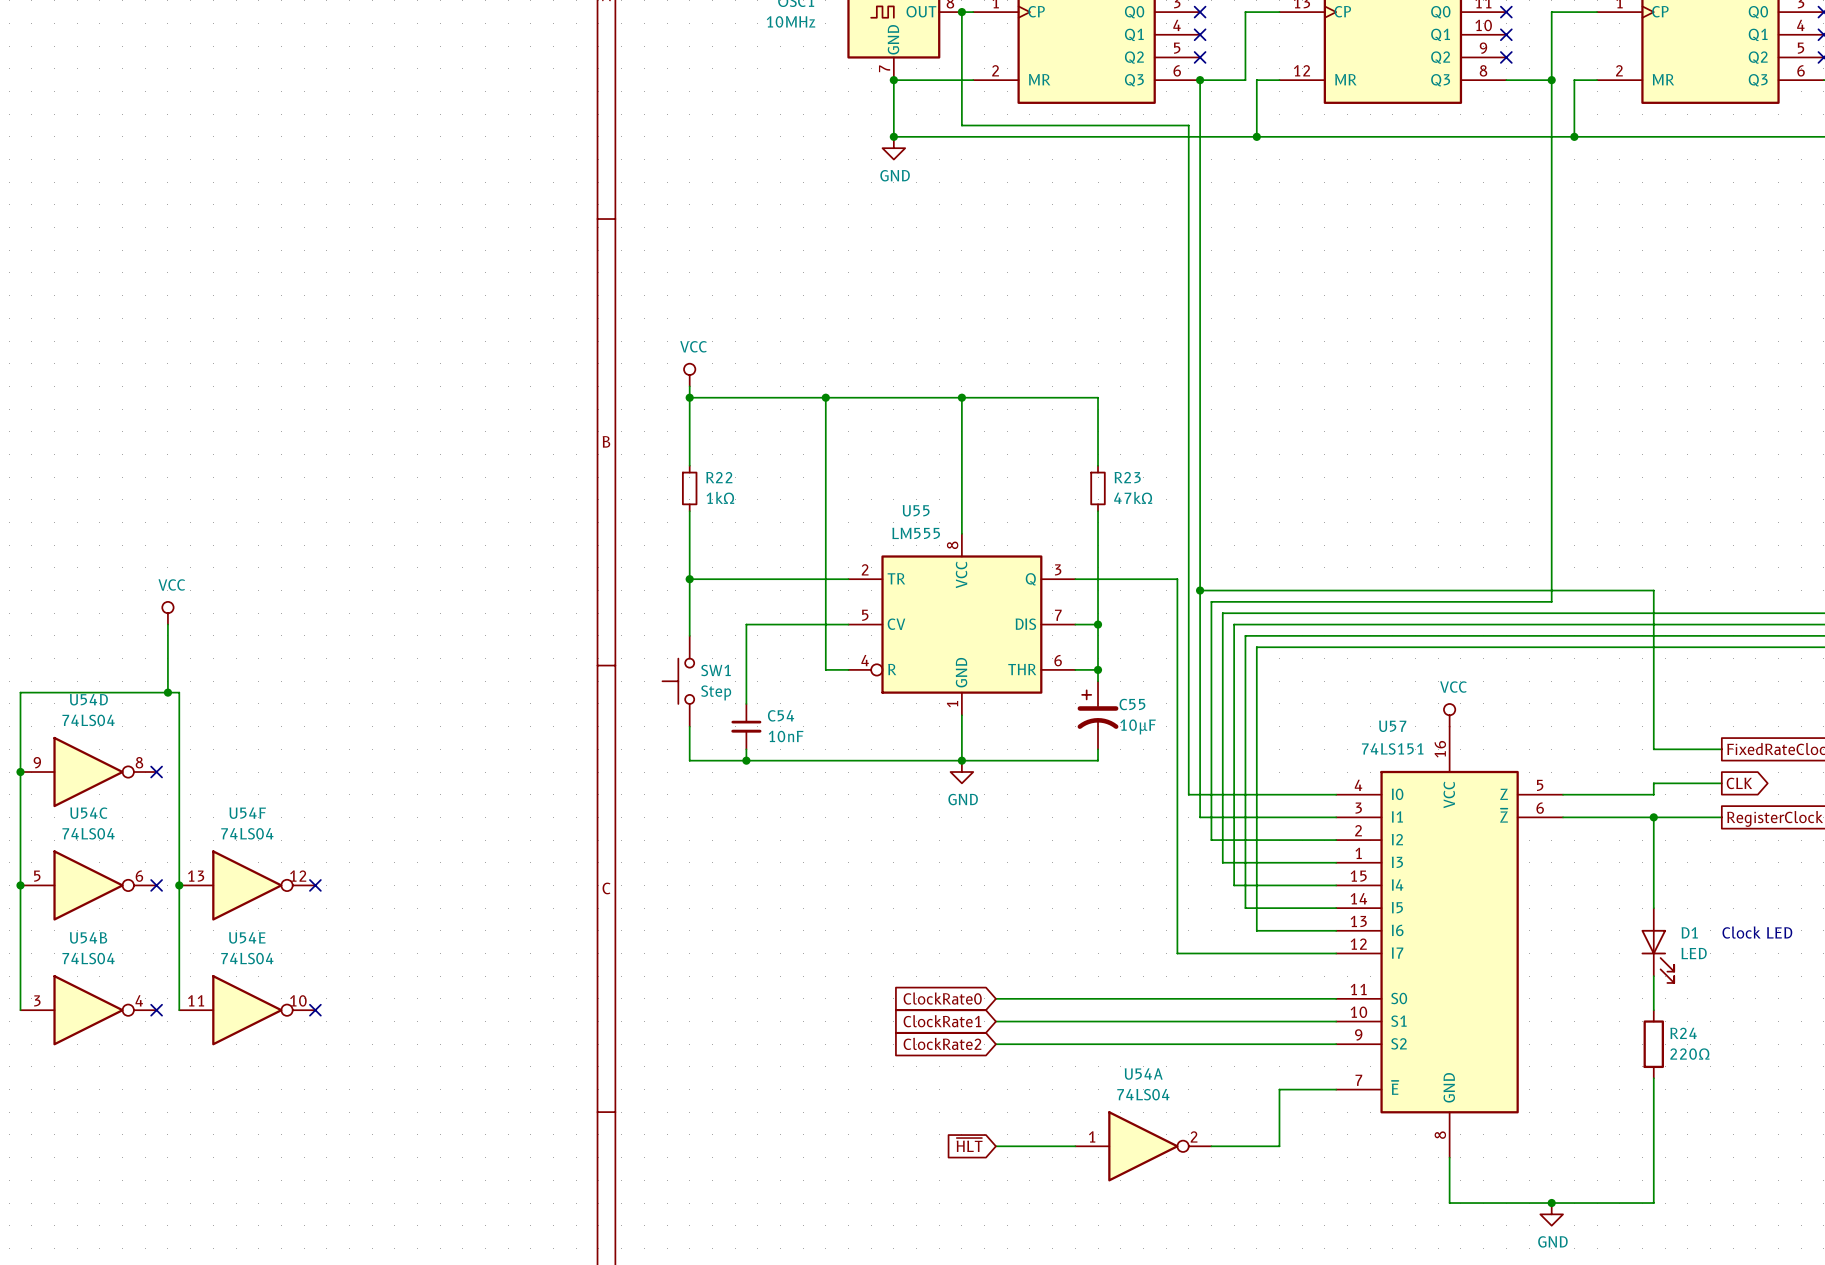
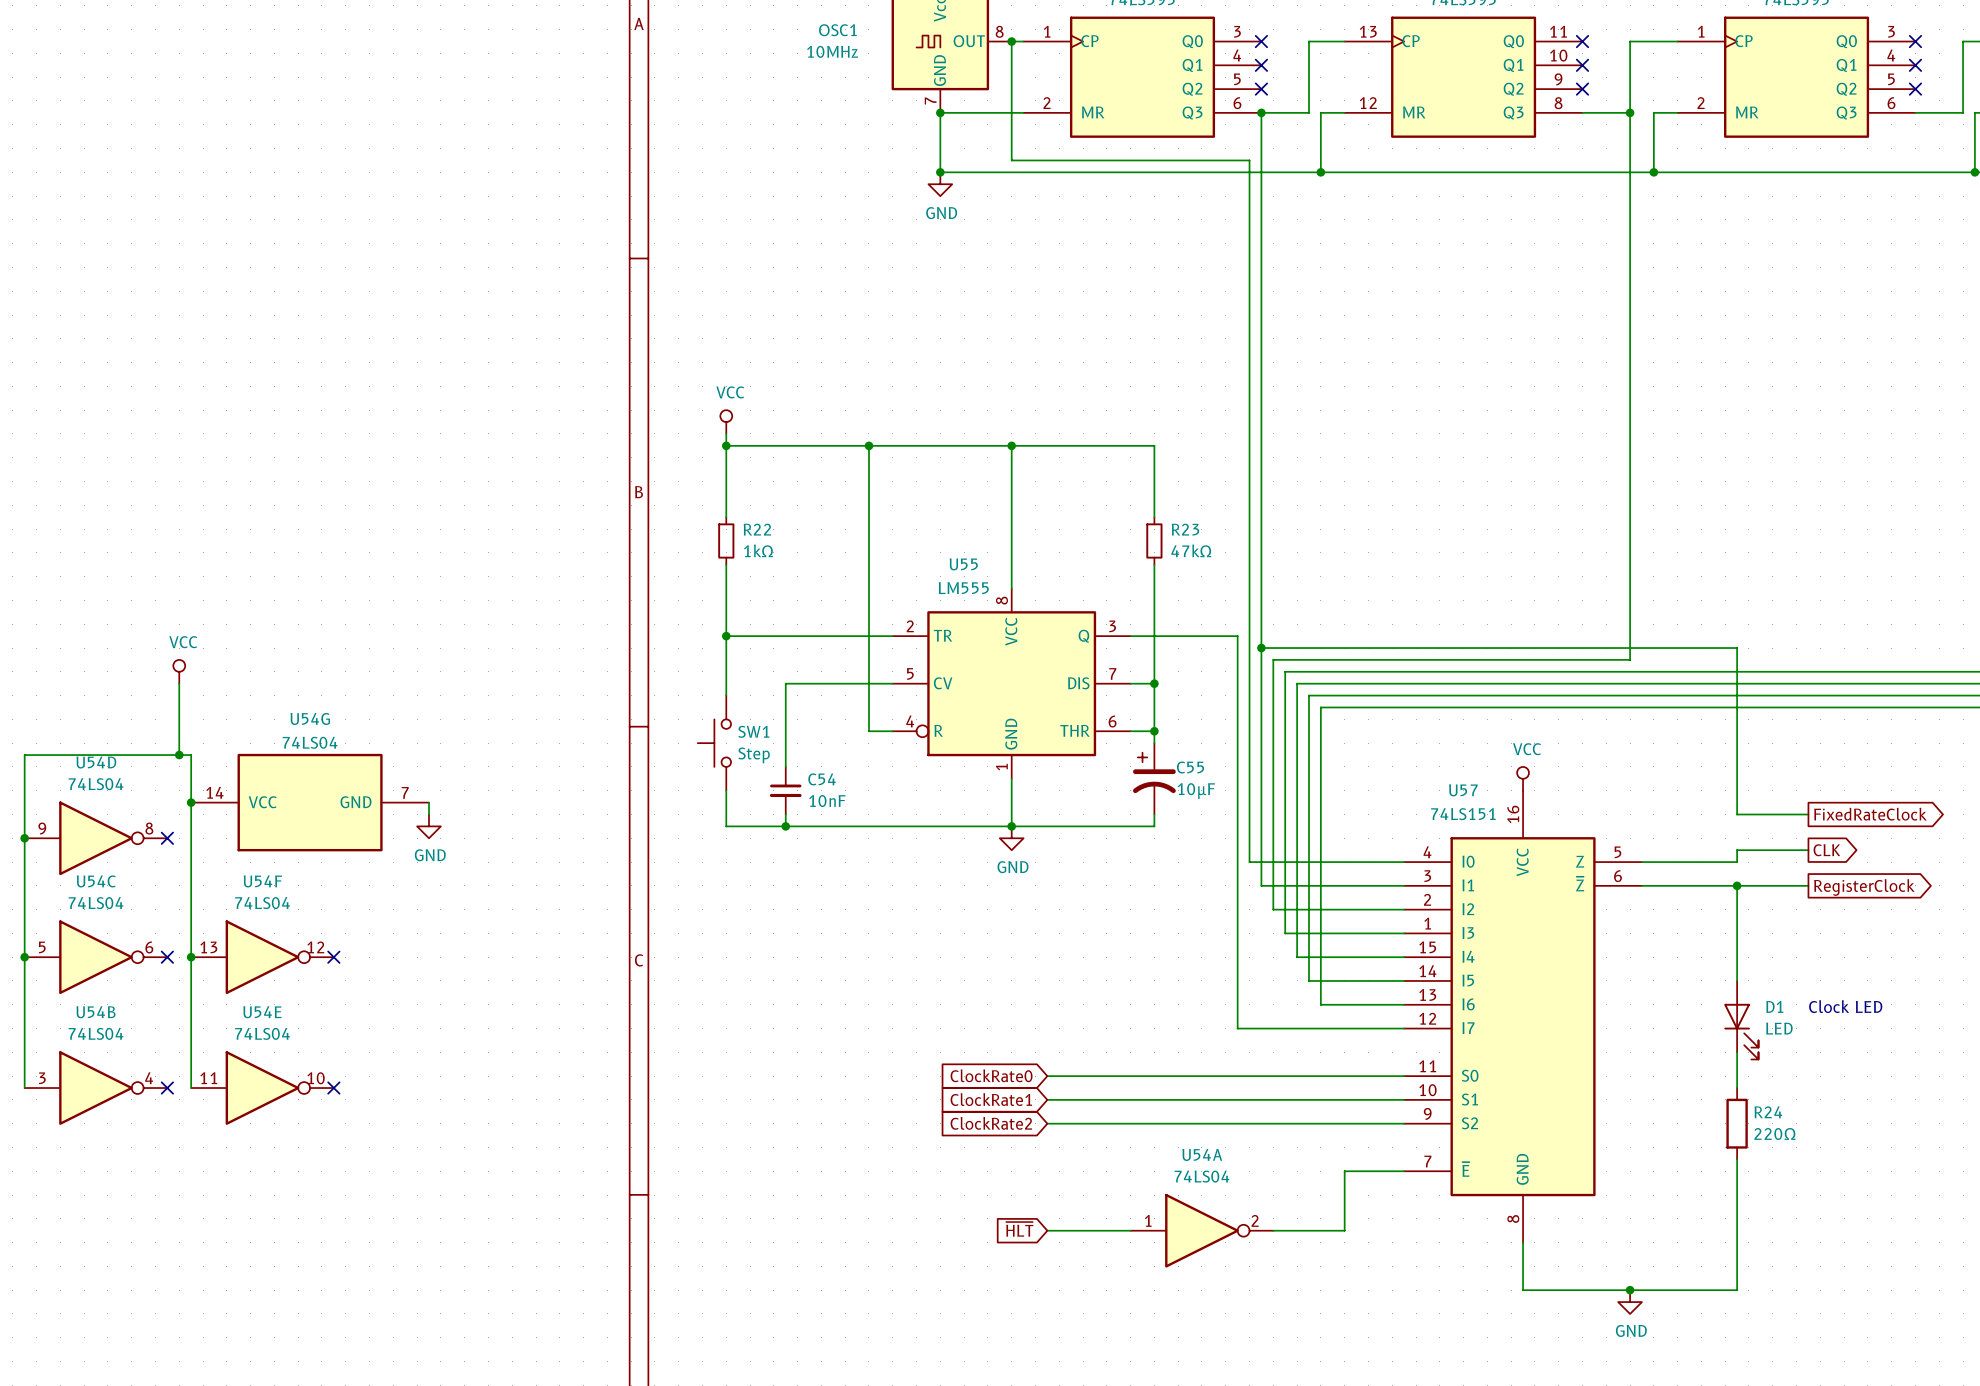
junction: none -> (191, 802)
U54G: none -> 74LS04 (310, 802)
wire: none -> (428, 802) (428, 814)
power symbol: none -> GND (428, 826)

